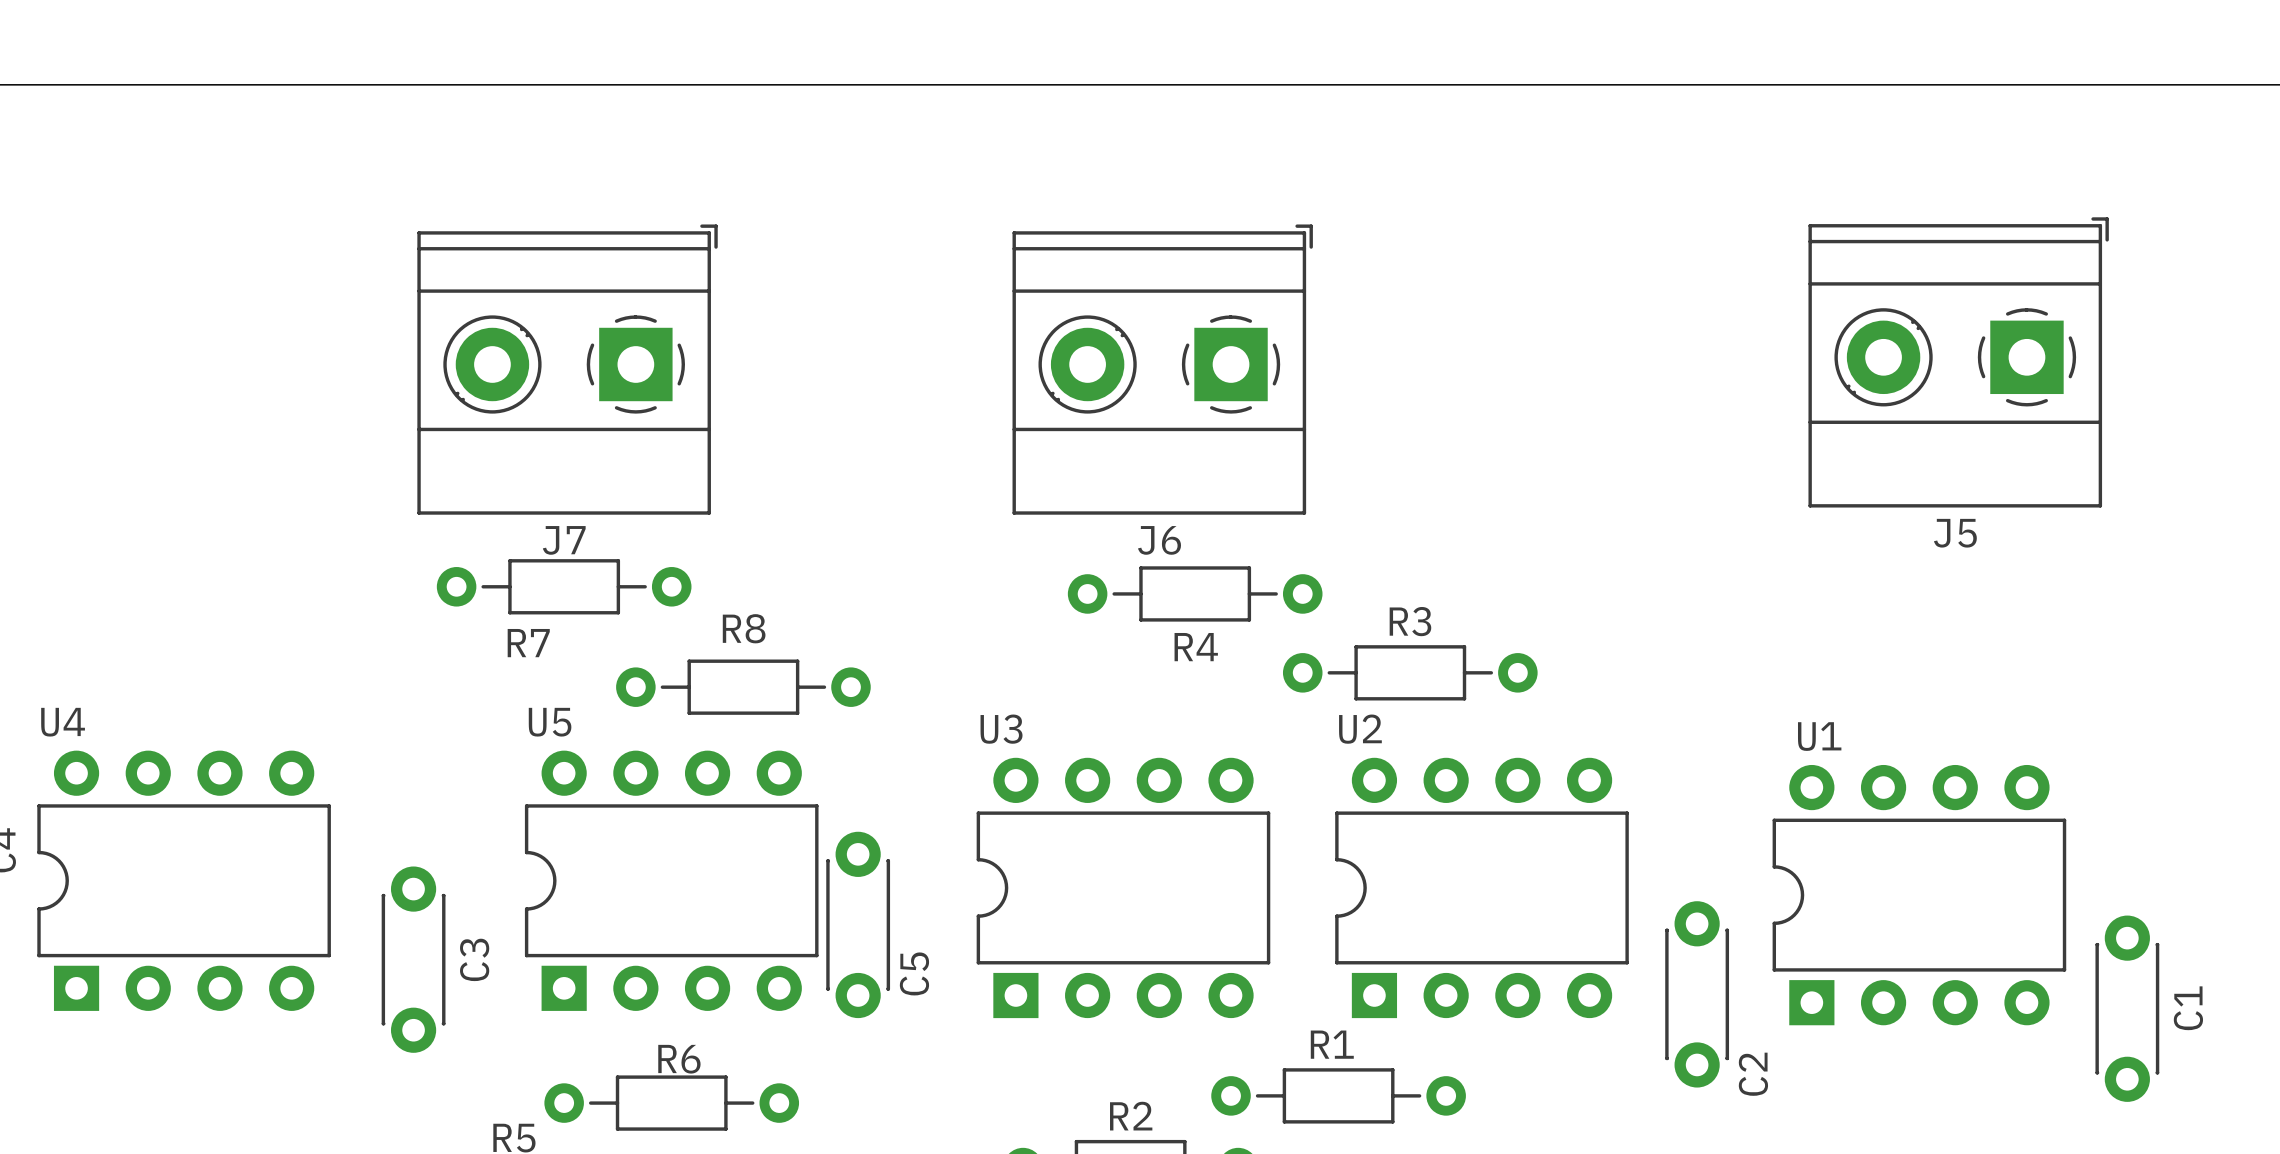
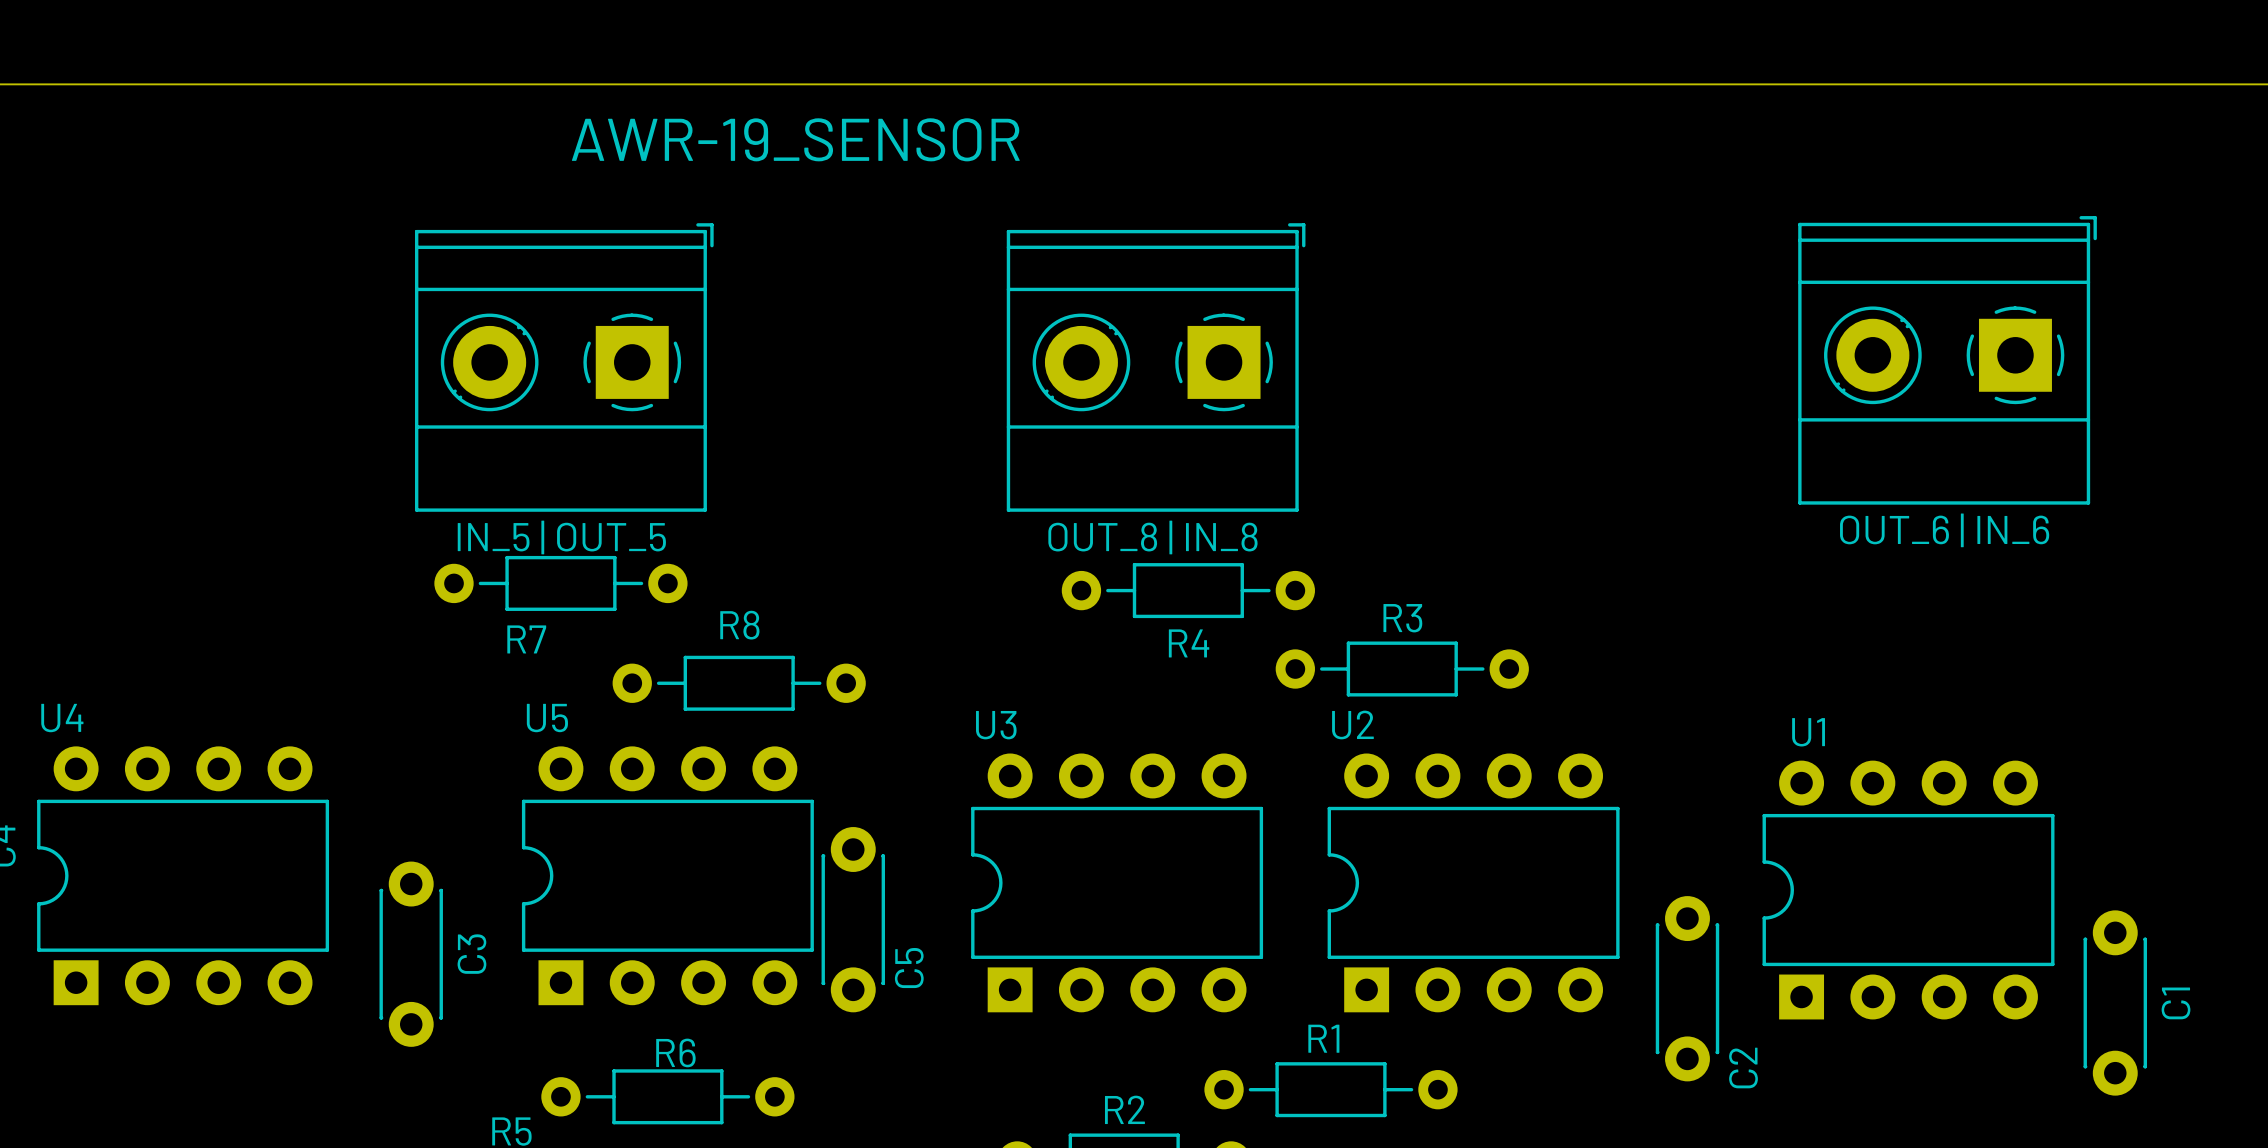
text: none -> AWR-19_SENSOR (795, 139)
J5 name: J5 (1955, 533) -> OUT_6 | IN_6 (1944, 530)
J7 name: J7 (564, 540) -> IN_5 | OUT_5 (561, 537)
J6 name: J6 (1159, 540) -> OUT_8 | IN_8 (1152, 537)

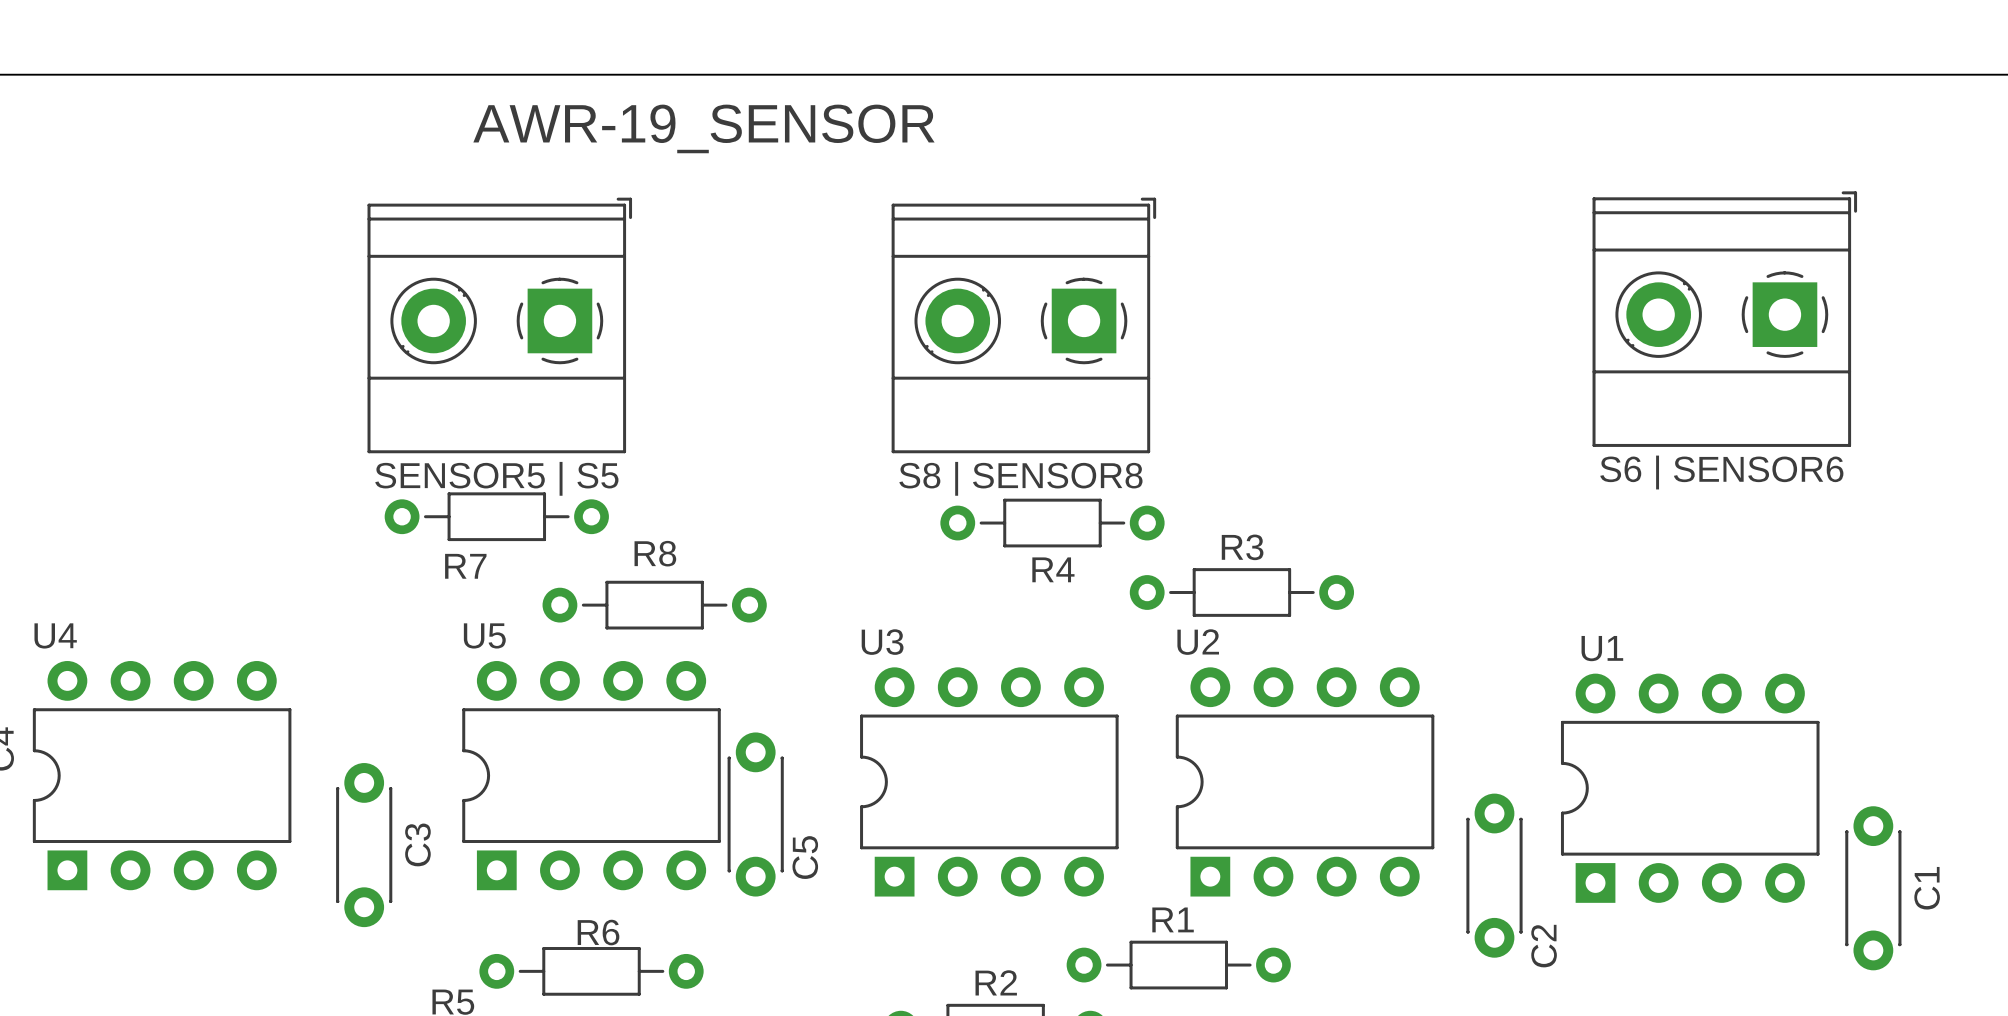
OUT_6 | IN_6 name: OUT_6 | IN_6 (1944, 530) -> S6 | SENSOR6 (1721, 472)
IN_5 | OUT_5 name: IN_5 | OUT_5 (561, 537) -> SENSOR5 | S5 (496, 478)
OUT_8 | IN_8 name: OUT_8 | IN_8 (1152, 537) -> S8 | SENSOR8 (1020, 478)

